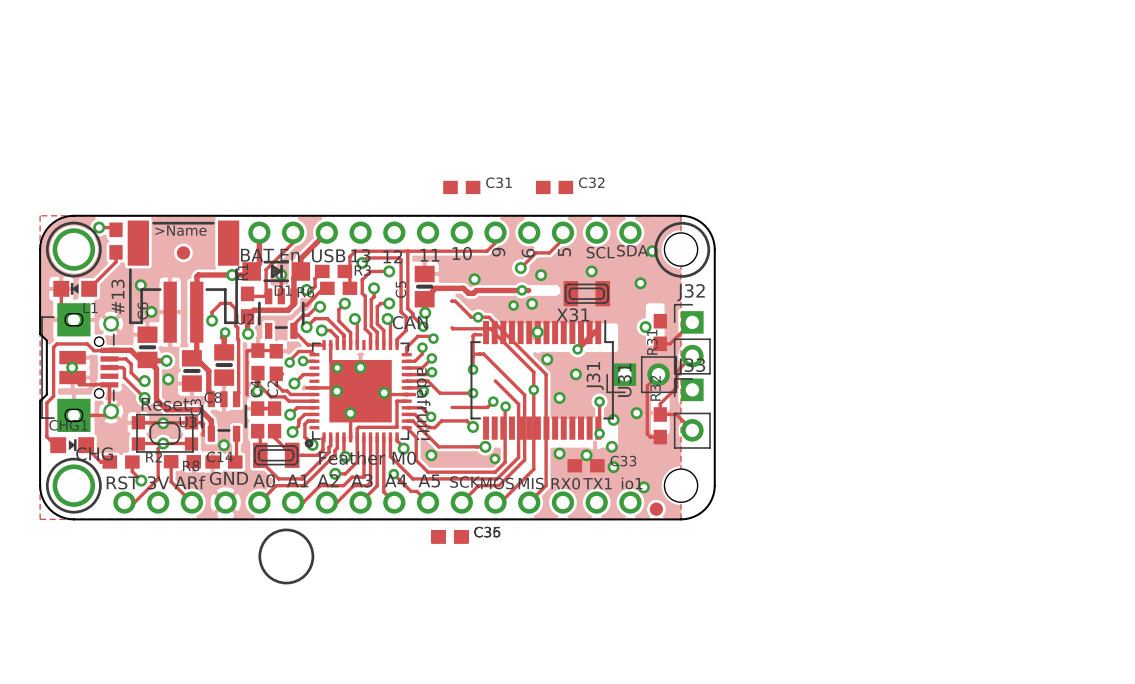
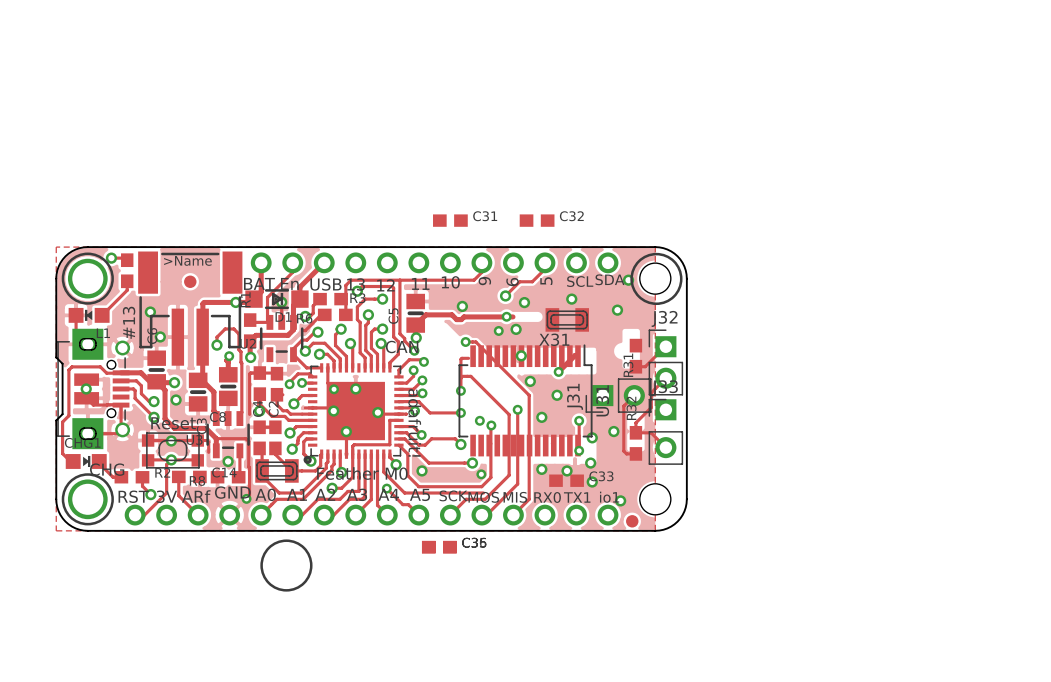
track: (452, 301) (455, 301) (471, 317) (478, 317) -> none
track: (452, 327) (490, 328) (533, 372) (533, 389) -> none
via: (645, 327) -> none
track: (495, 380) (518, 404) (518, 457) (497, 478) -> none
track: (493, 401) (487, 407) (452, 407) -> none
track: none -> (216, 438) (245, 438) (248, 441) (249, 495) (246, 498)
via: none -> (246, 498)

